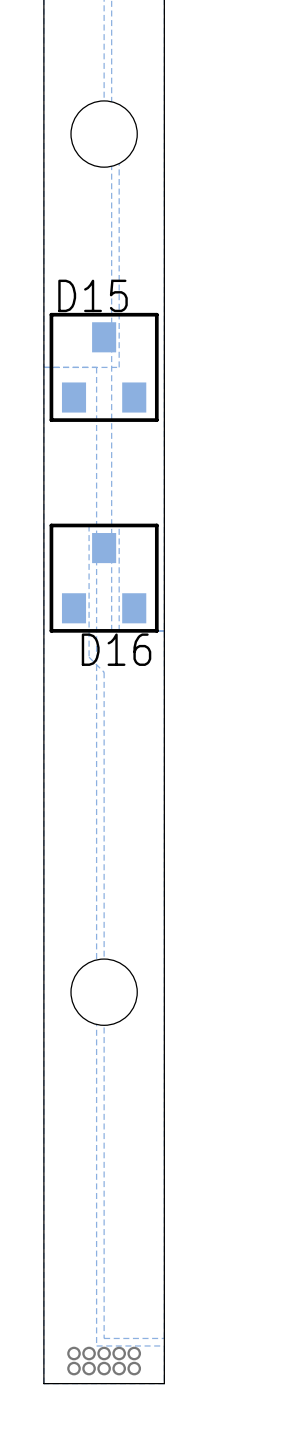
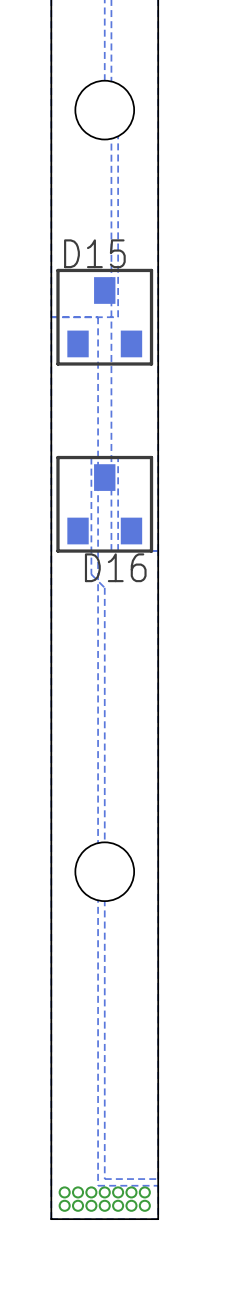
via: none -> (64, 1192)
via: none -> (144, 1192)
via: none -> (64, 1205)
via: none -> (144, 1205)

